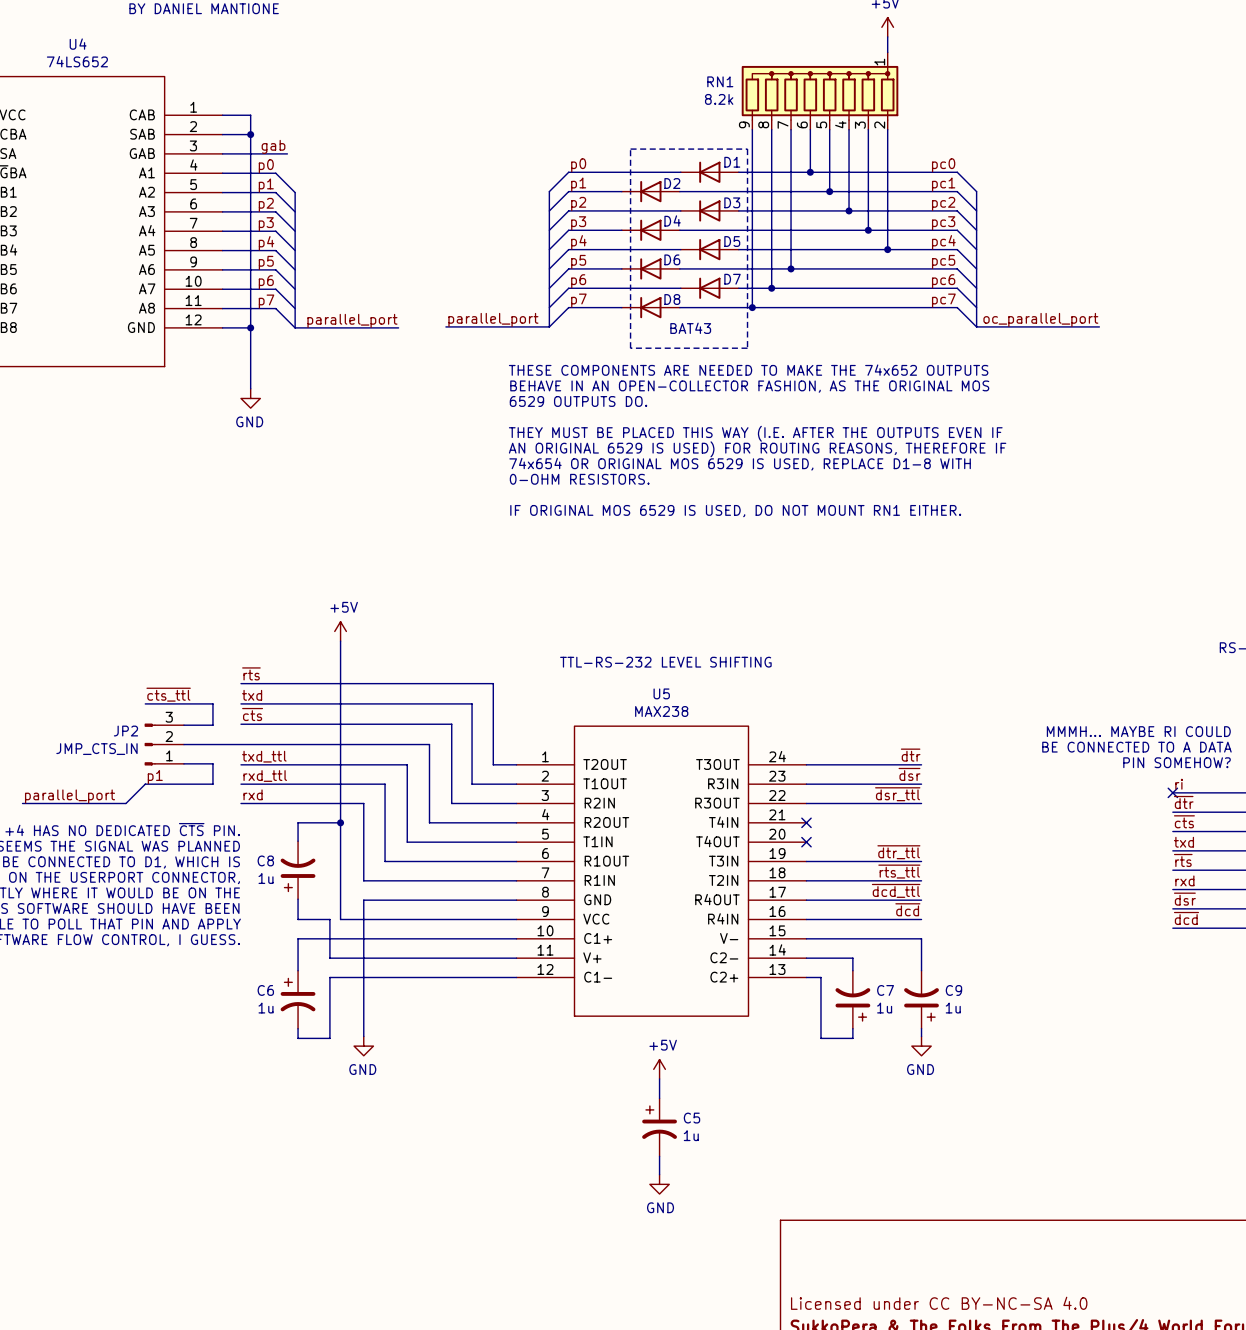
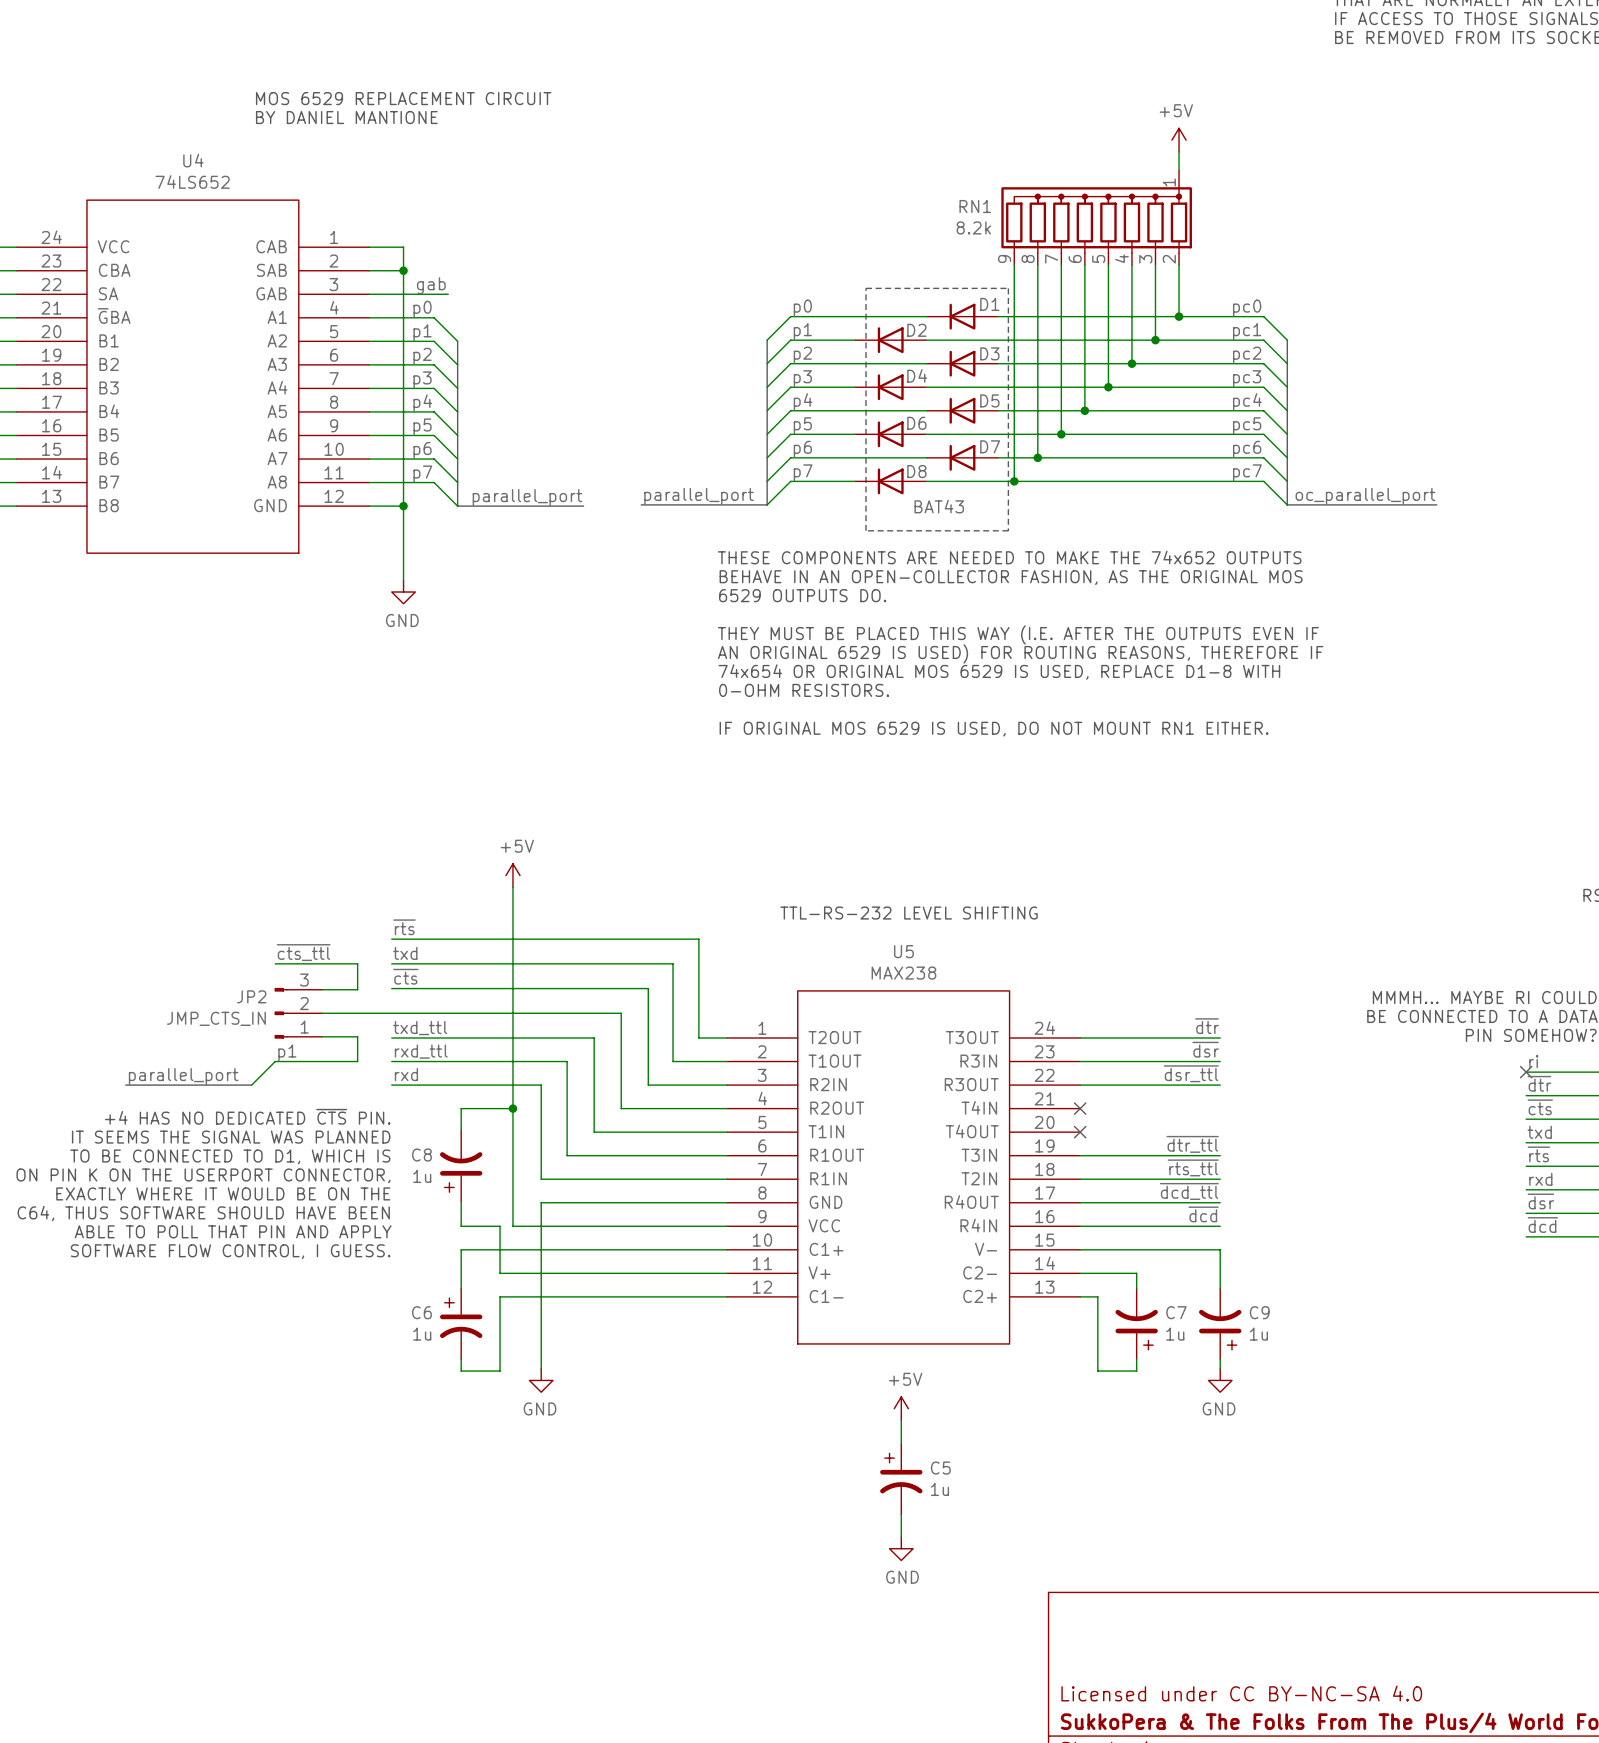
junction: (810, 172) -> none
wire: (887, 172) (887, 249) -> (1084, 316) (1084, 410)
junction: none -> (1179, 316)
junction: (829, 191) -> none
wire: (868, 191) (868, 230) -> (1108, 340) (1108, 387)
junction: none -> (1155, 340)
junction: none -> (1108, 387)
junction: (868, 230) -> none
junction: none -> (1084, 410)
junction: (887, 249) -> none

